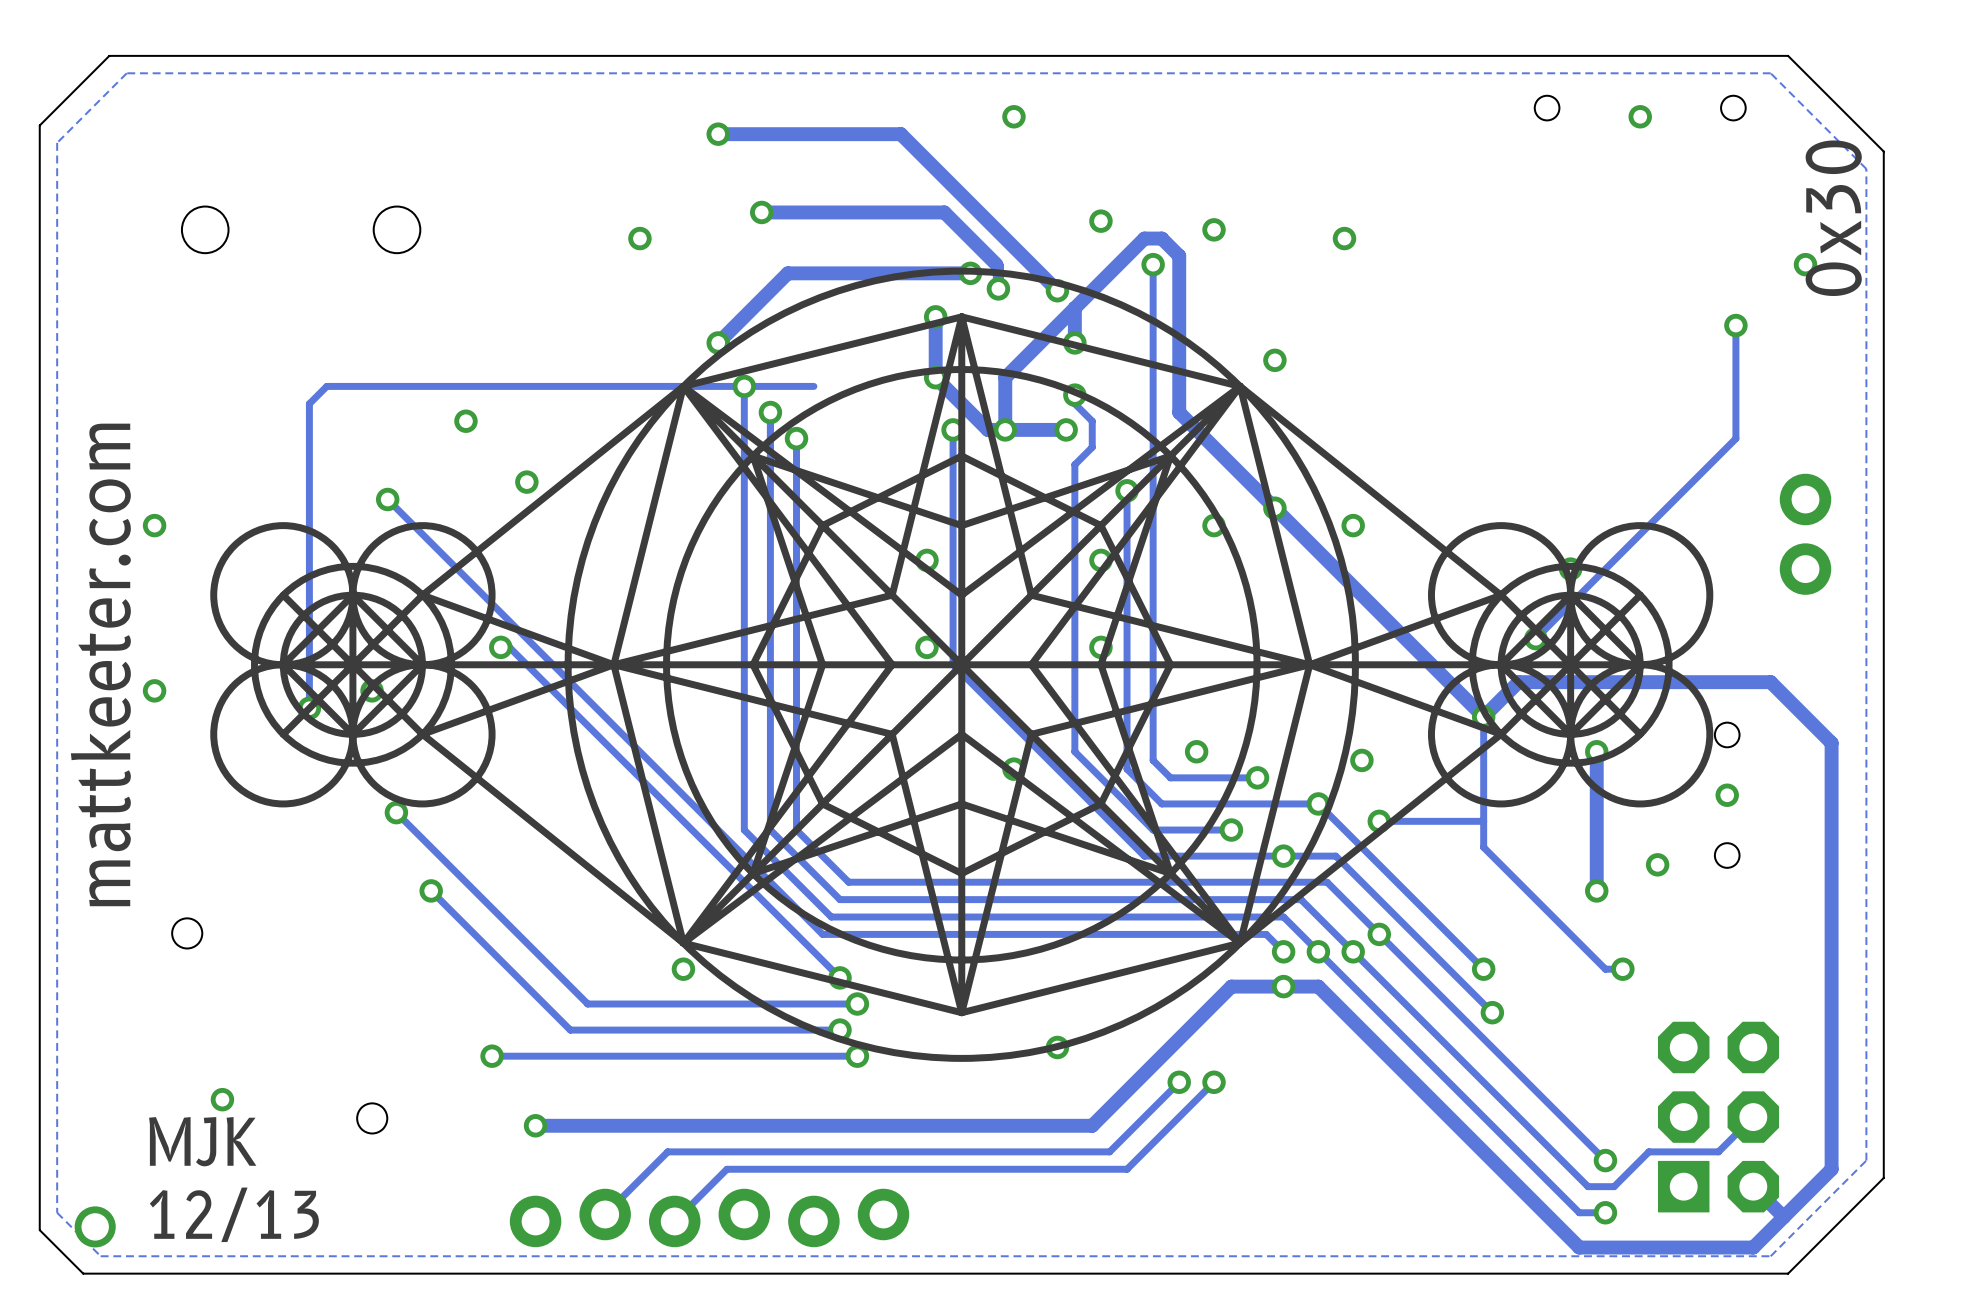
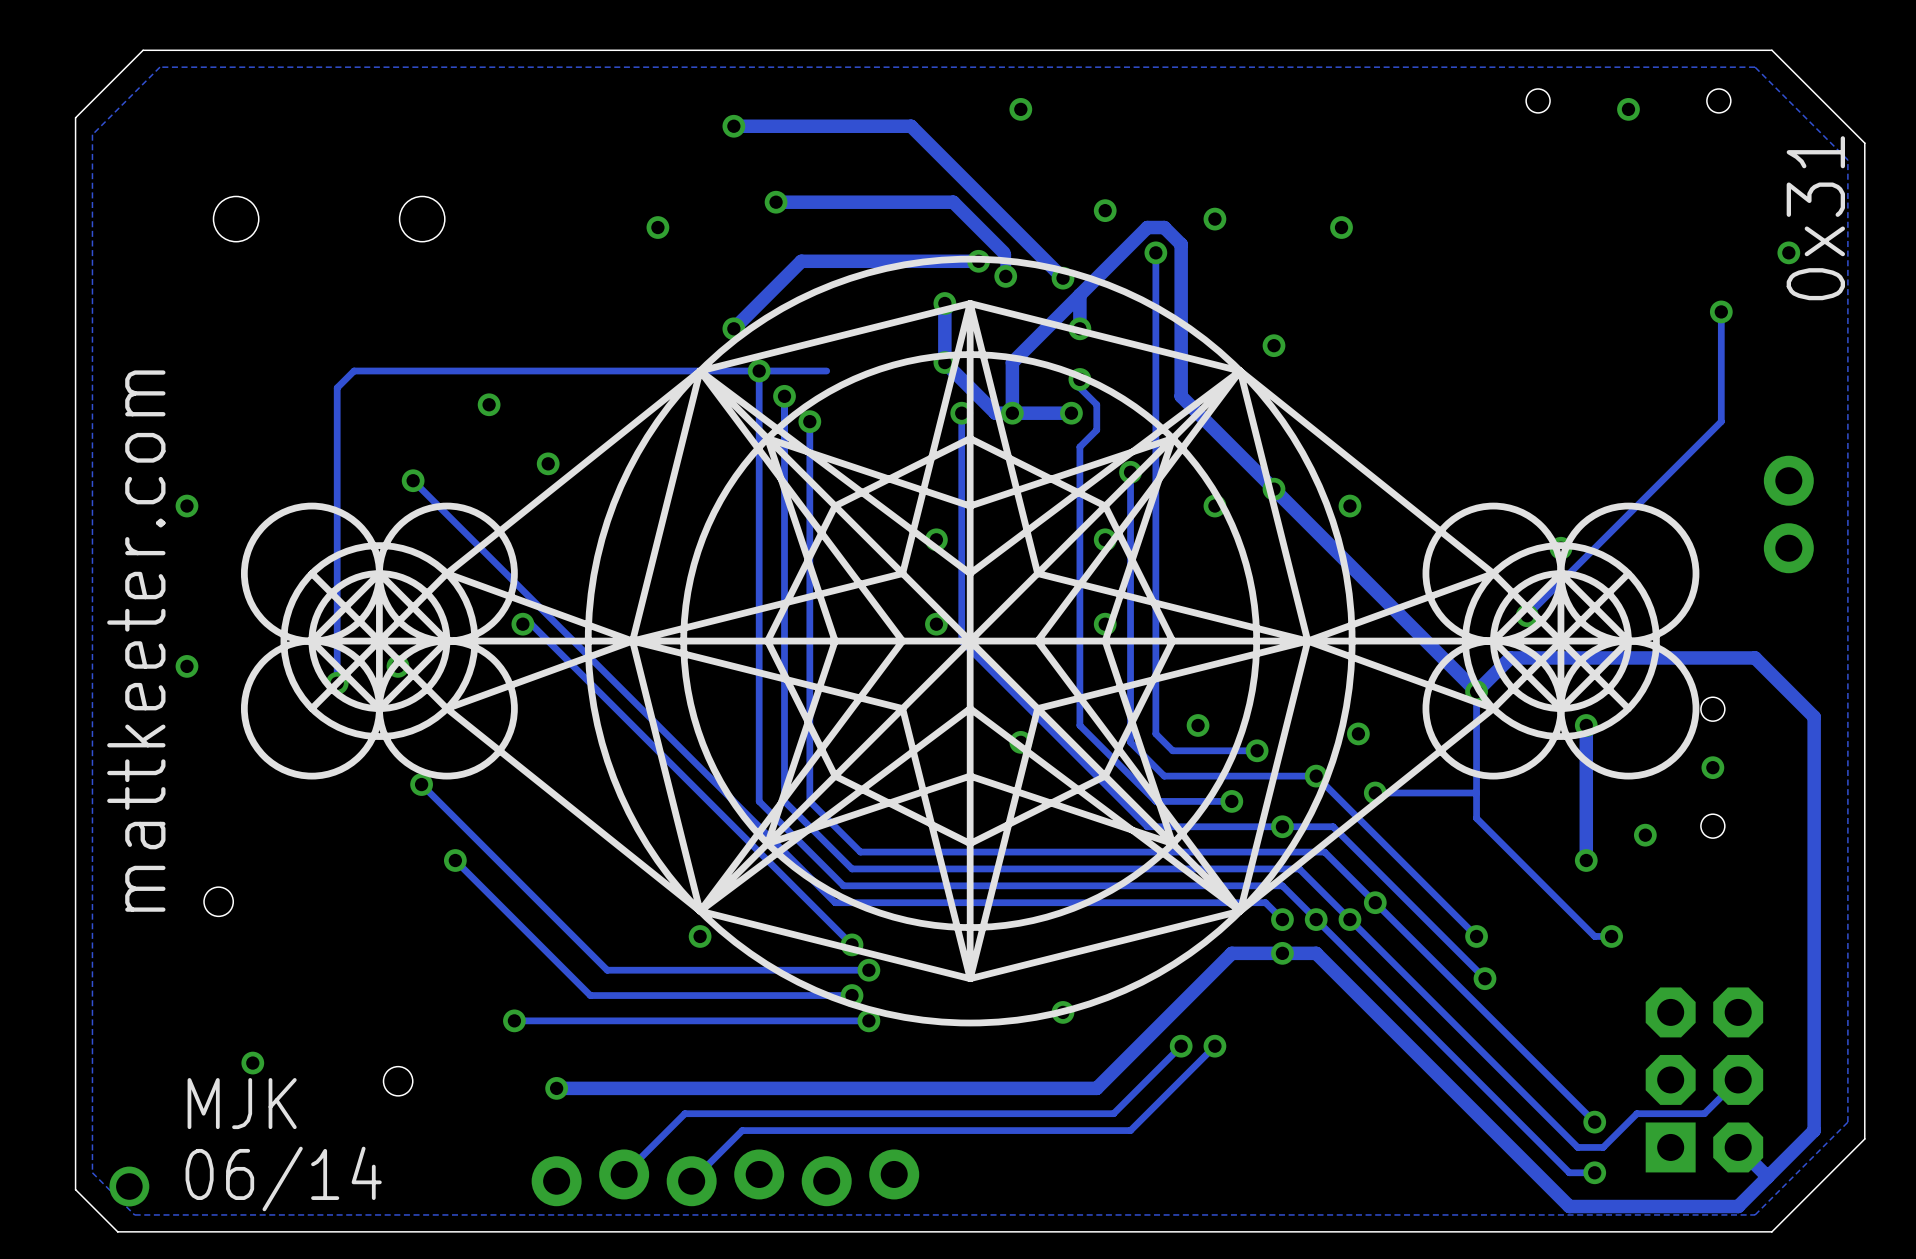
text: 0x30 (1833, 218) -> 0x31 (1815, 218)
text: 12/13 (234, 1214) -> 06/14 (283, 1178)

